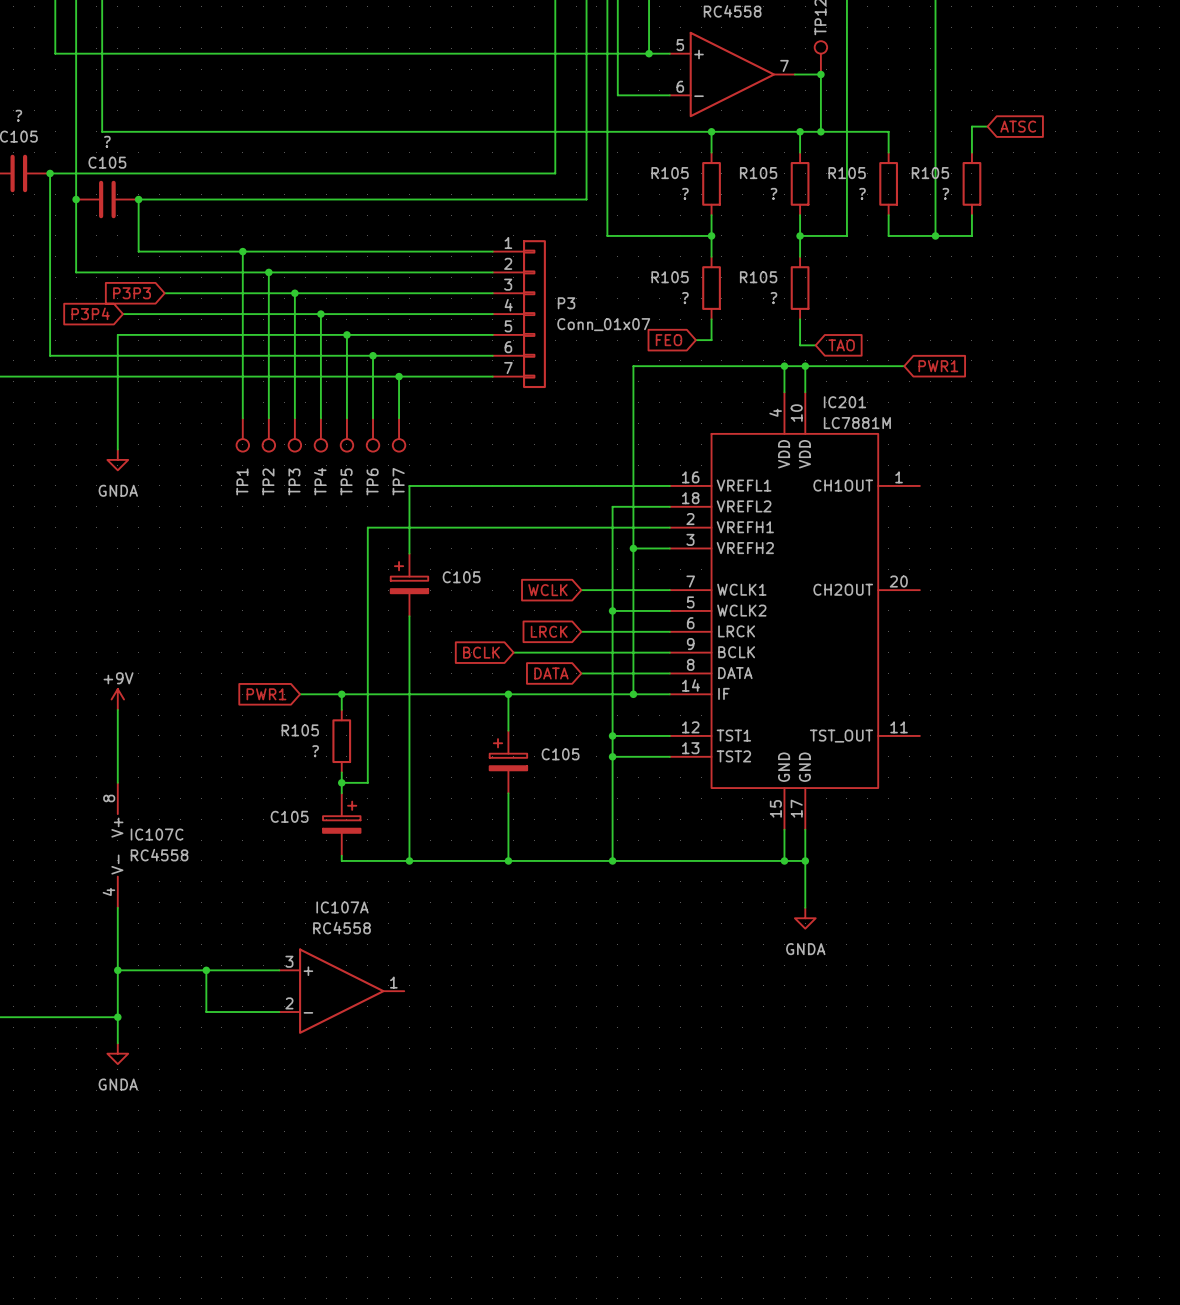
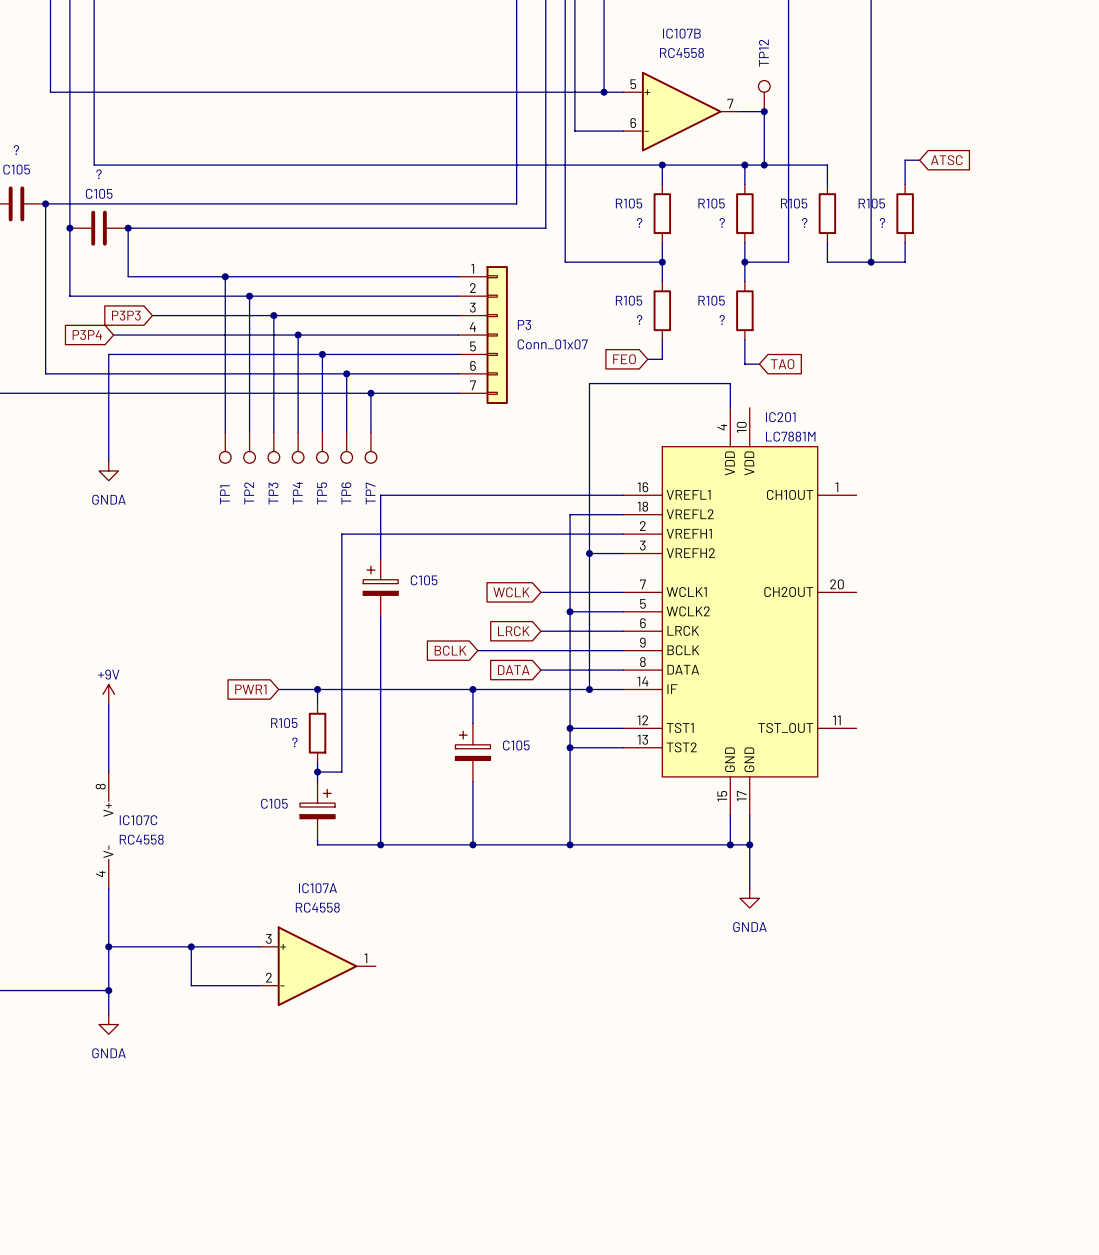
wire: (784, 366) (904, 366) -> none
junction: (784, 366) -> none
wire: (805, 366) (805, 392) -> none
junction: (805, 366) -> none
global label: PWR1 (938, 366) -> none

